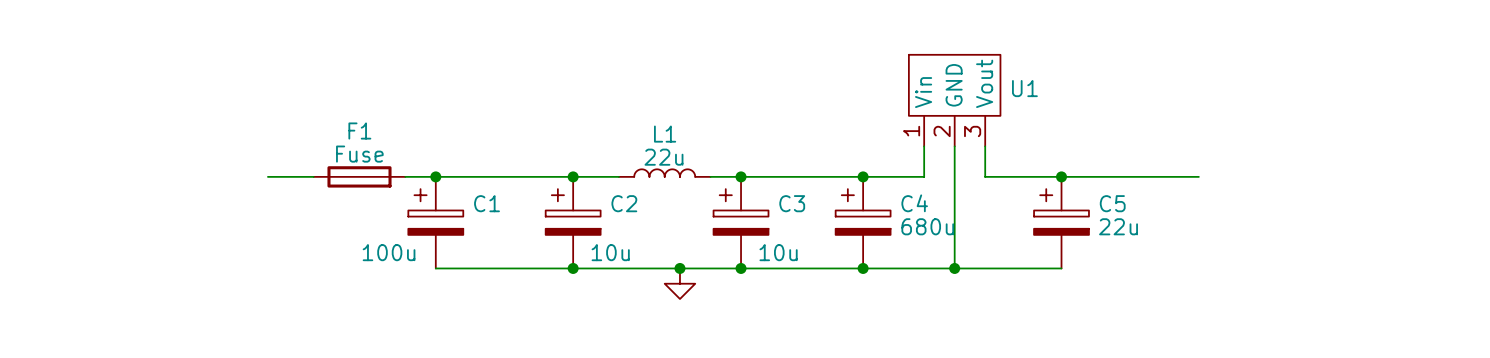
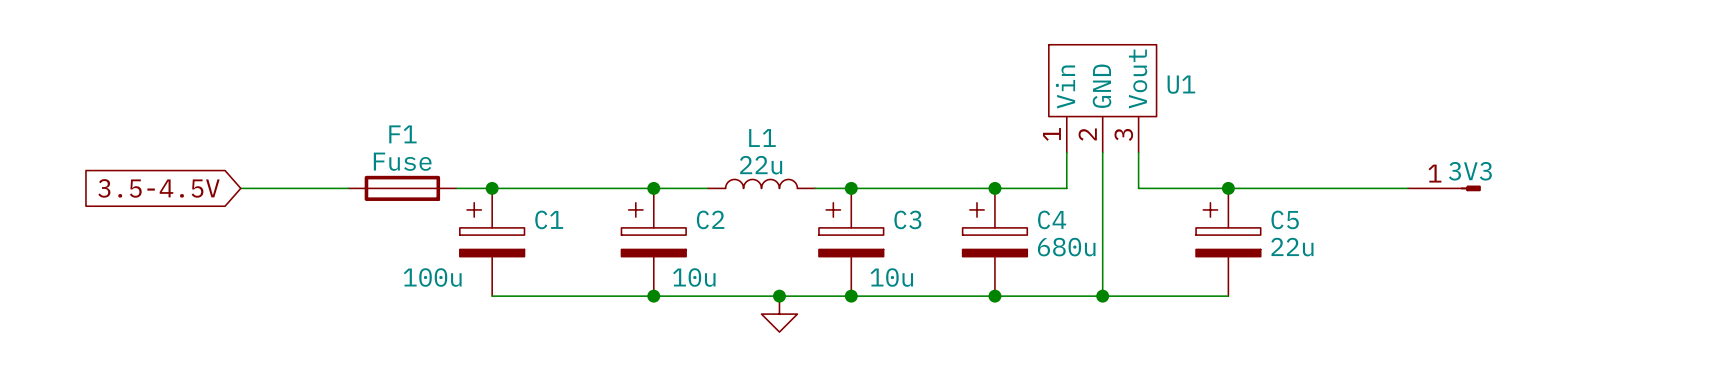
global label: none -> 3.5-4.5V (158, 188)
wire: none -> (240, 188) (294, 188)
wire: none -> (1389, 188) (1407, 188)
3V3: none -> (1444, 188)

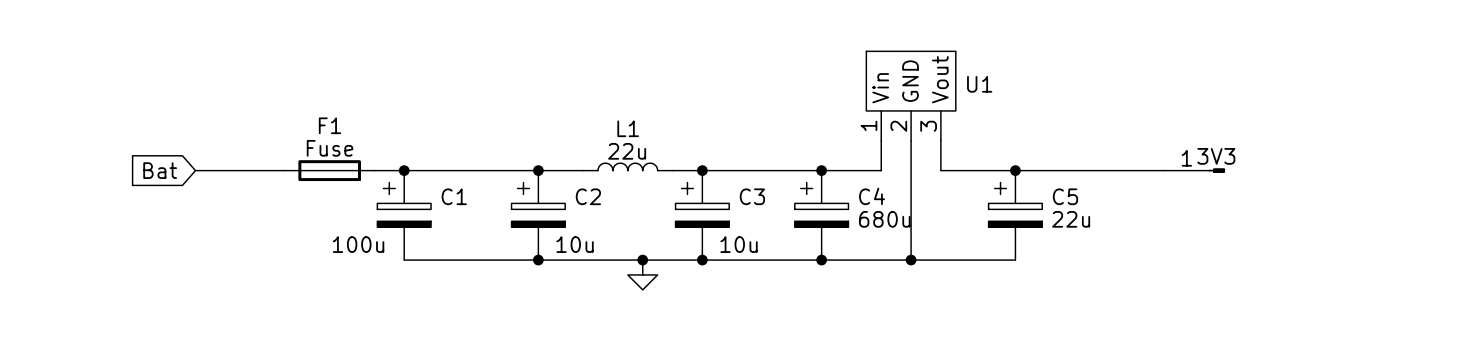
global label: 3.5-4.5V (158, 188) -> Bat (160, 170)

